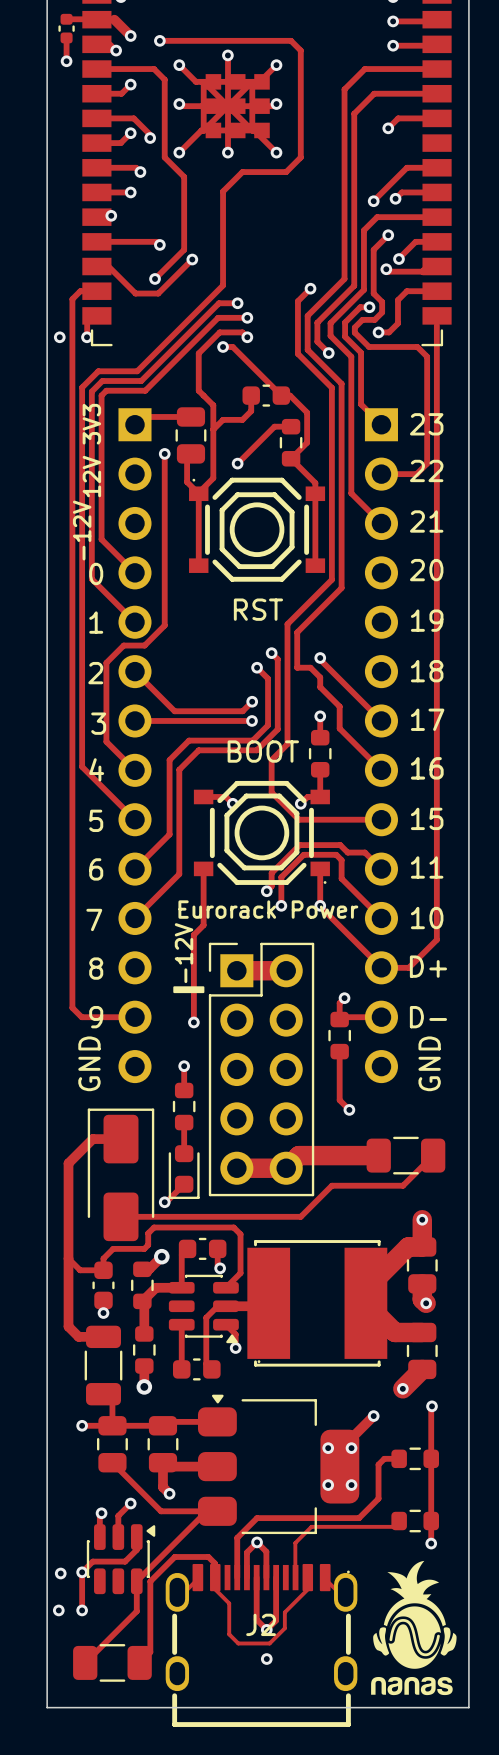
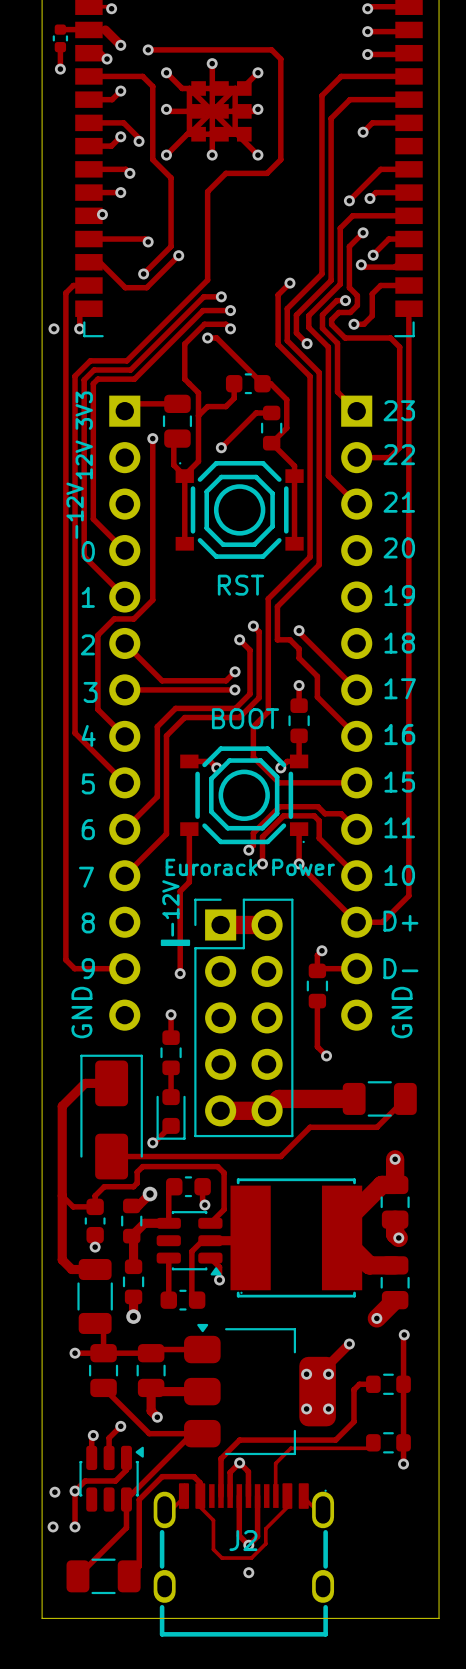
drawing: [371, 1560, 457, 1696] -> none

